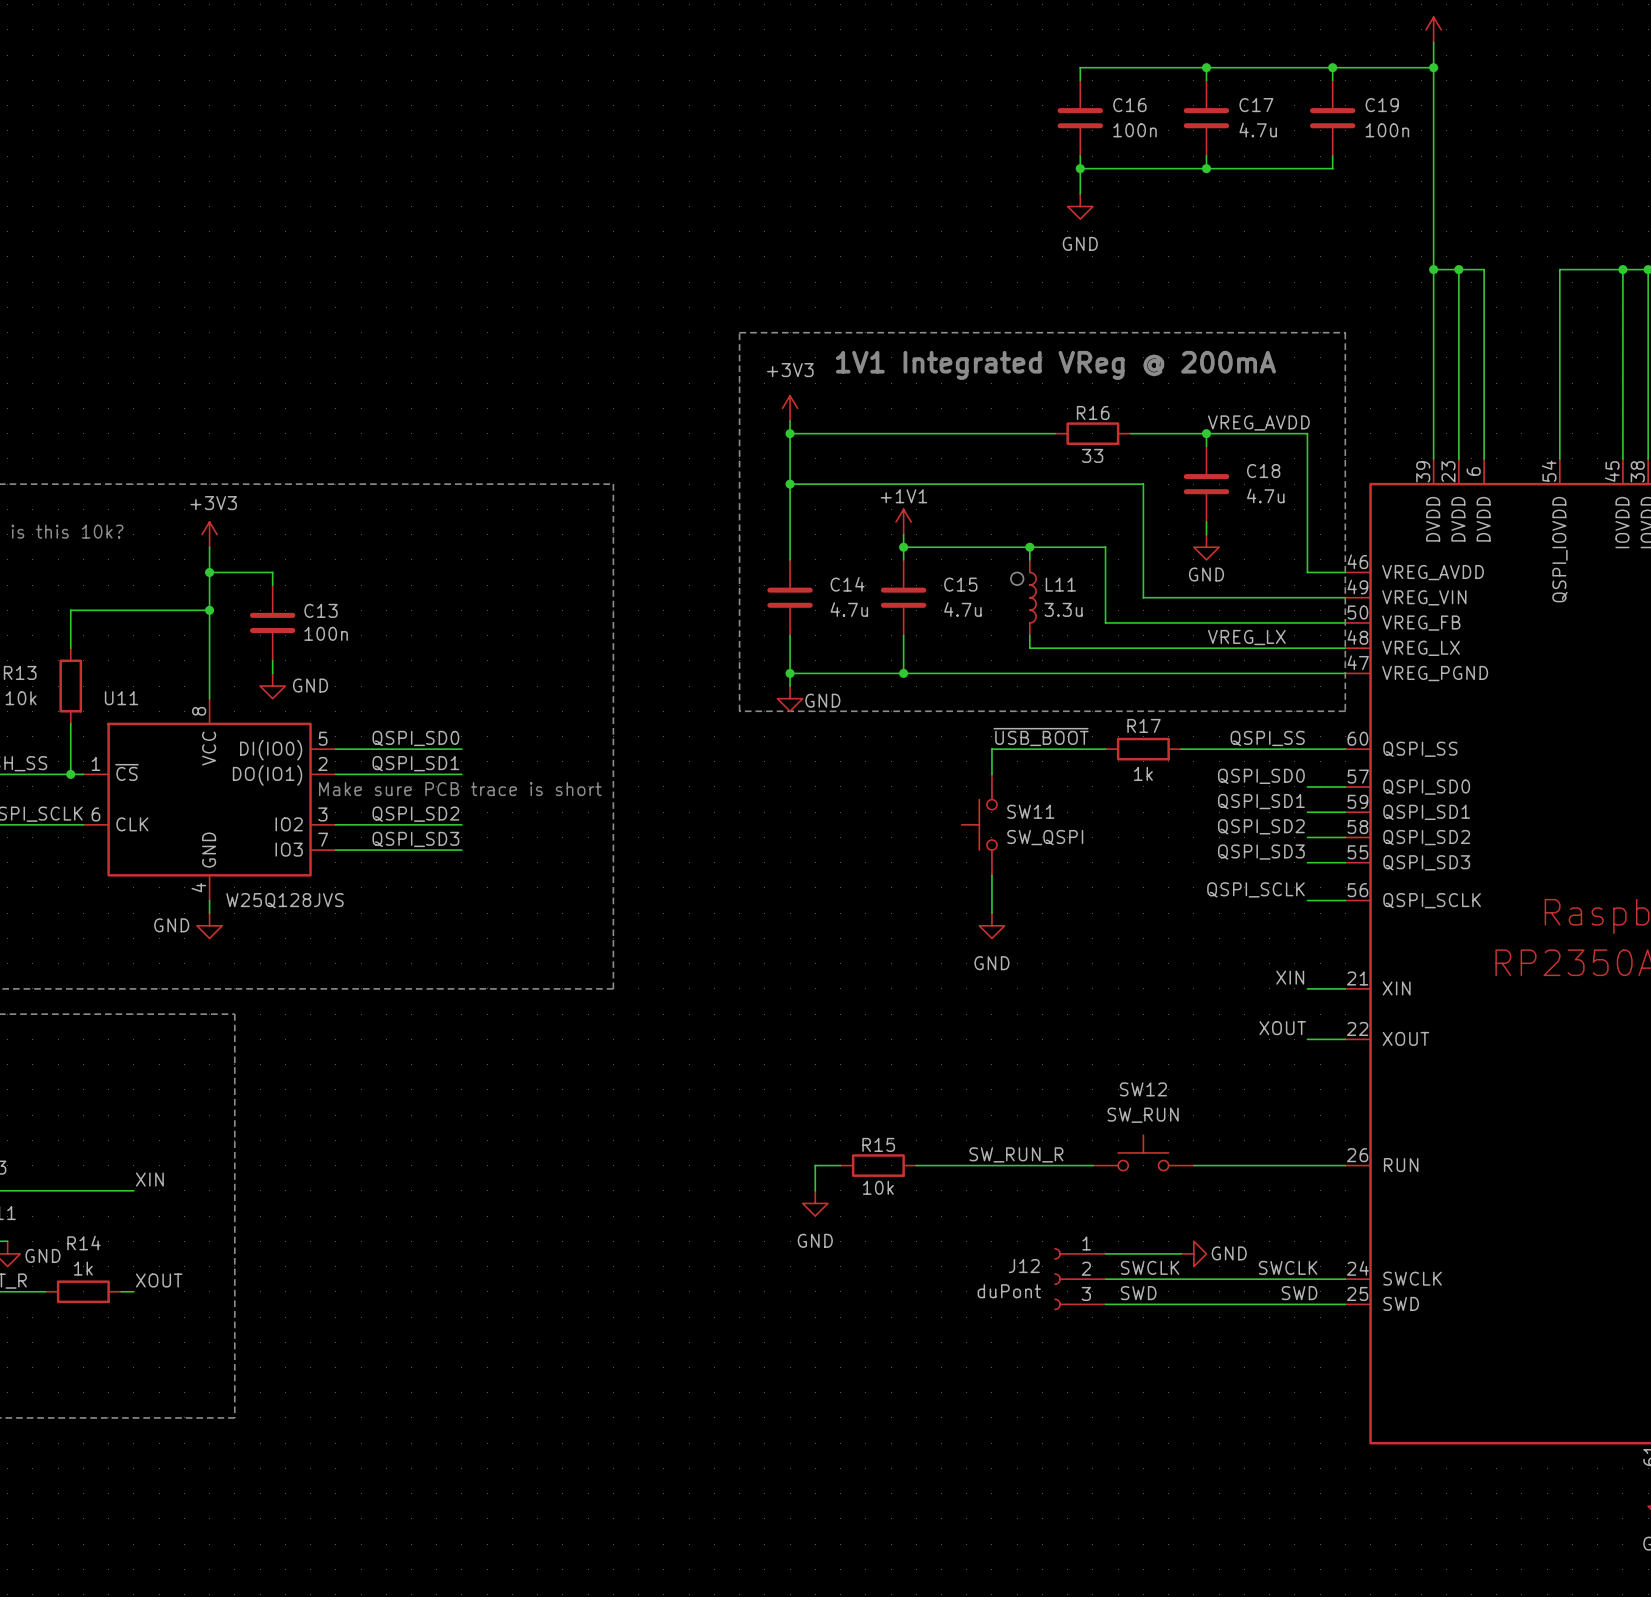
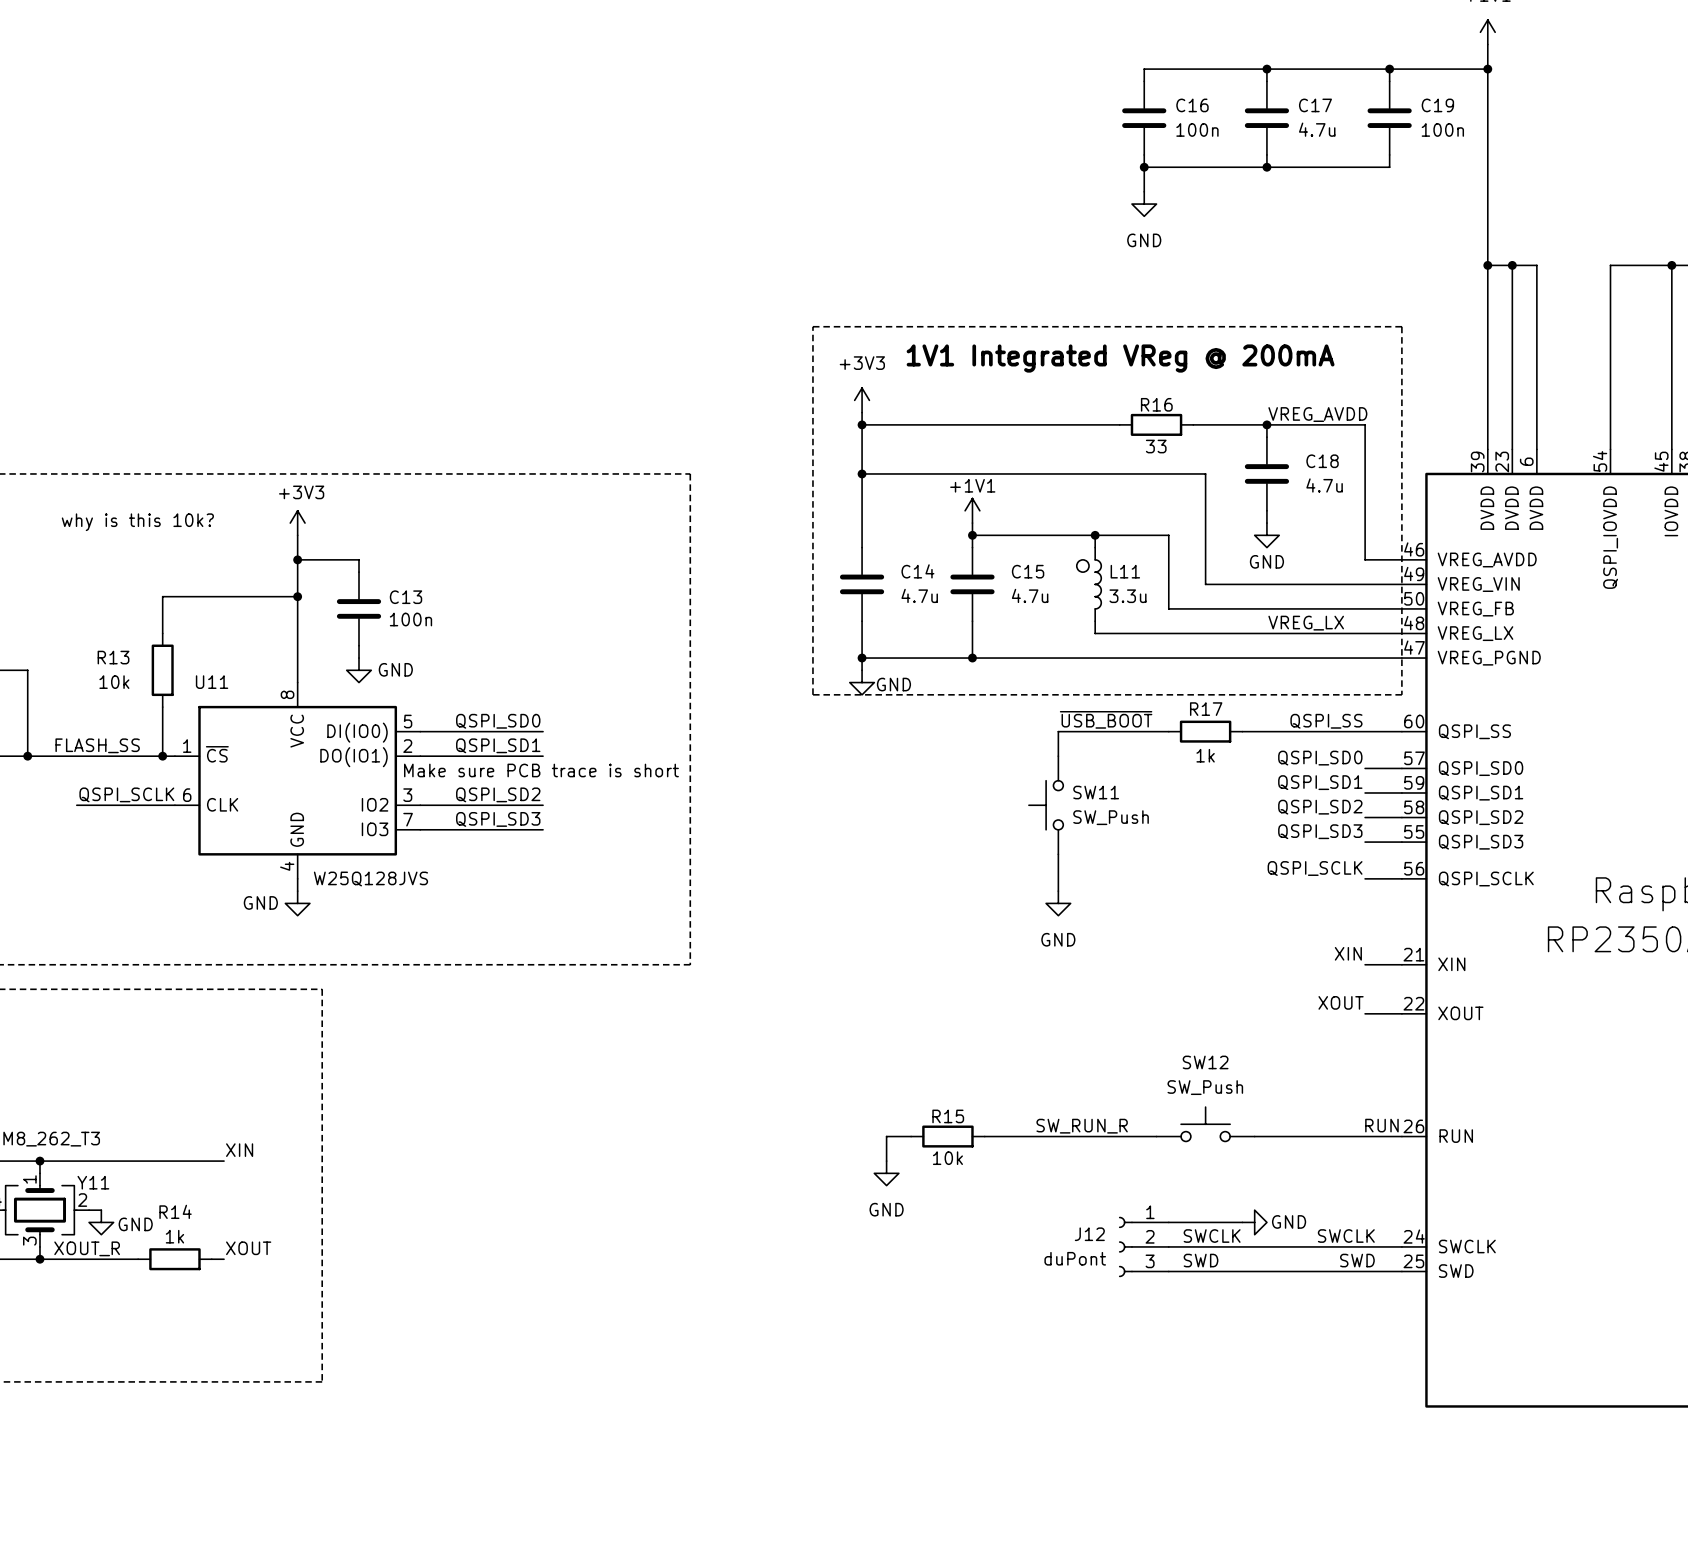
SW11 value: SW_QSPI (1045, 837) -> SW_Push (1111, 817)
SW12 value: SW_RUN (1143, 1115) -> SW_Push (1205, 1087)
label: none -> RUN (1381, 1125)

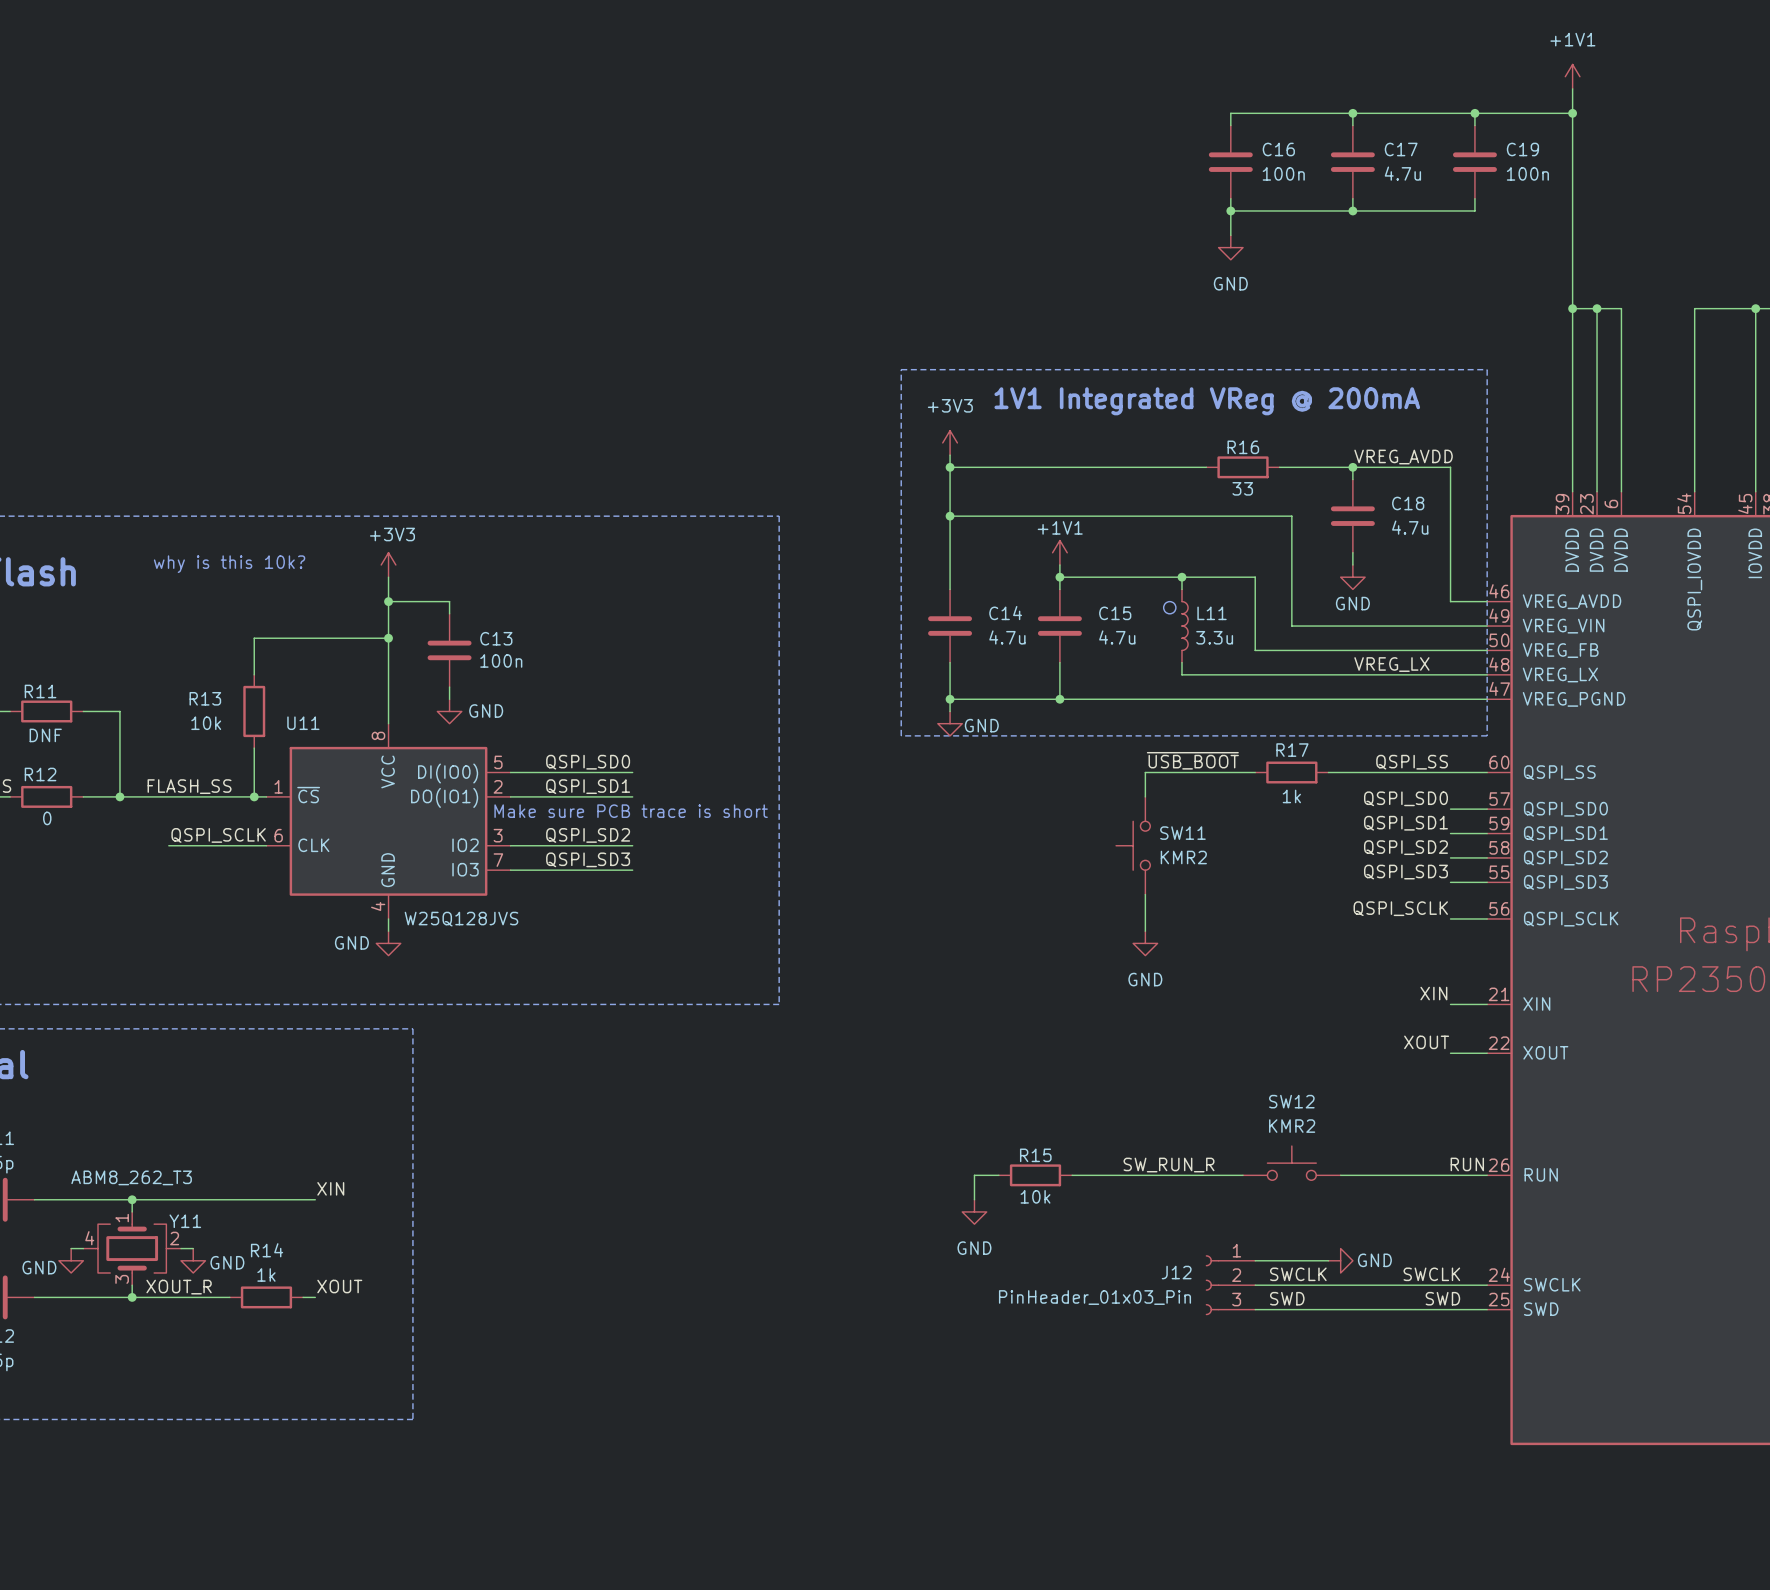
SW11 value: SW_Push (1111, 817) -> KMR2 (1183, 857)
SW12 value: SW_Push (1205, 1087) -> KMR2 (1292, 1126)
J12 value: duPont (1075, 1258) -> PinHeader_01x03_Pin (1094, 1297)

